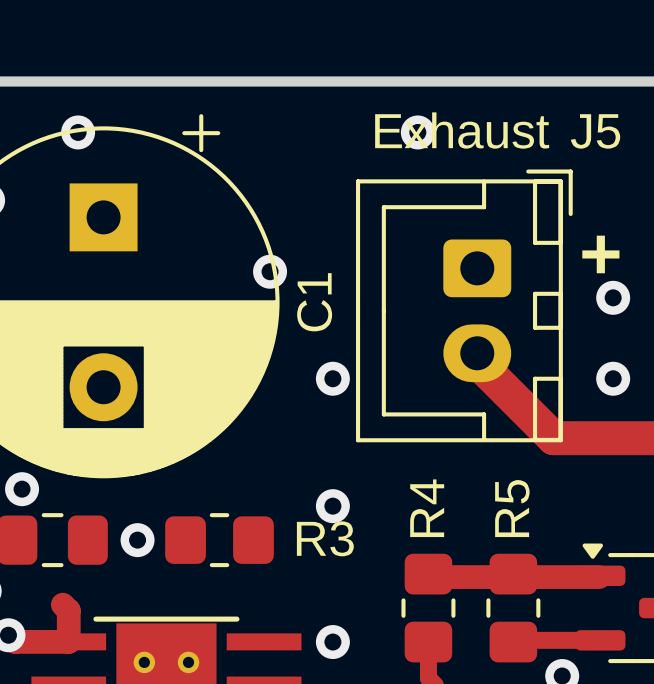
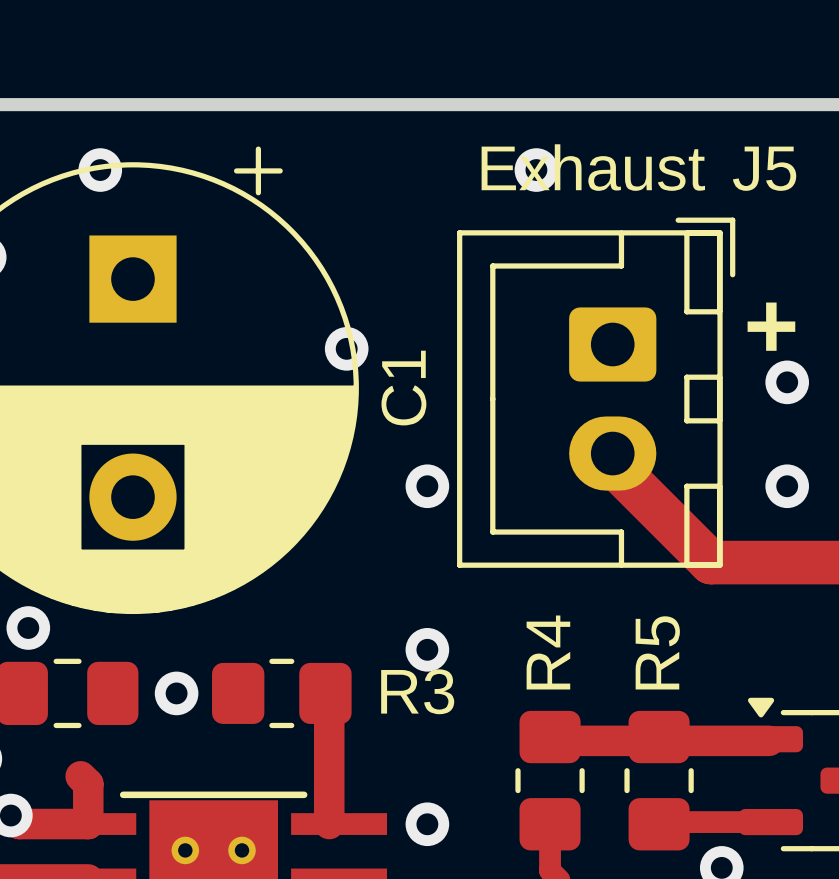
track: none -> (329, 707) (329, 824)

